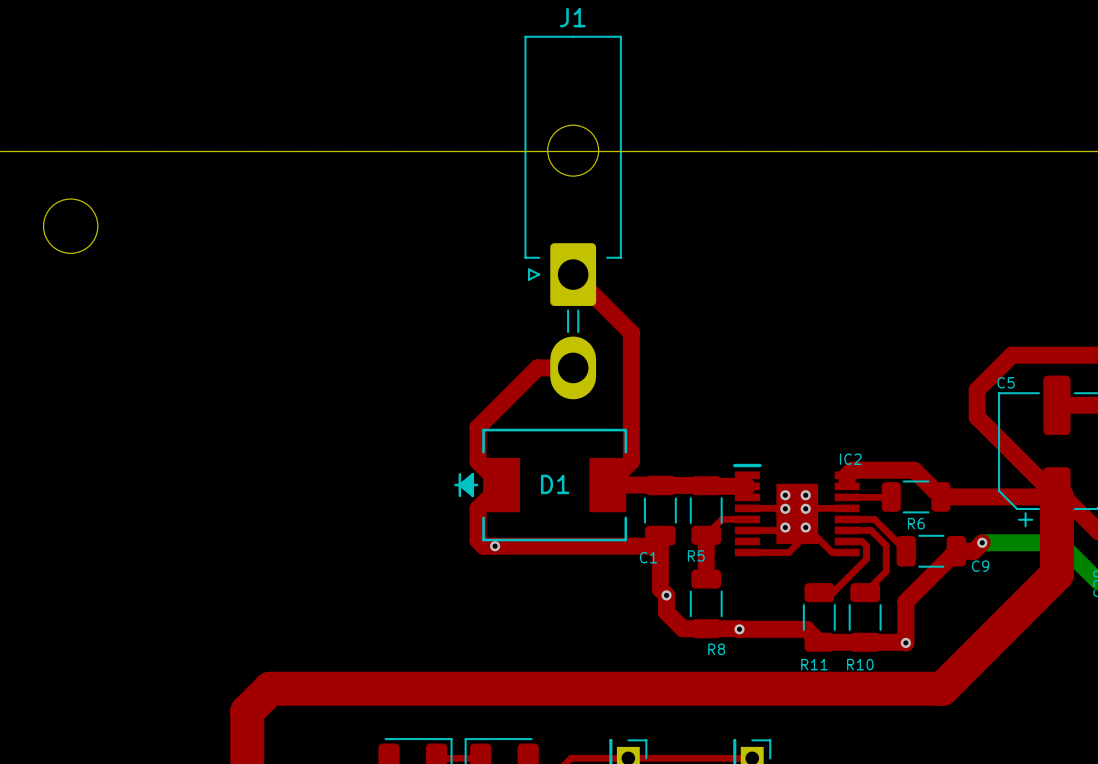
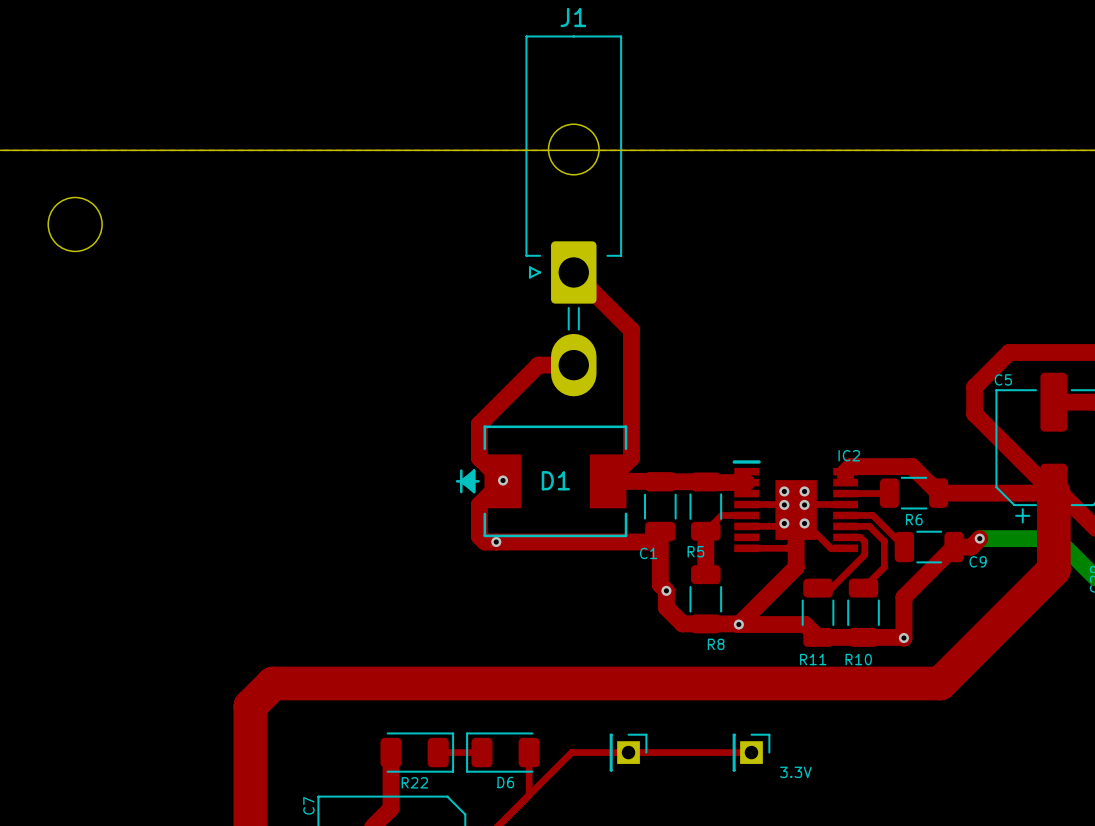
via: none -> (503, 480)
top track: none -> (796, 509) (796, 567) (738, 624)

